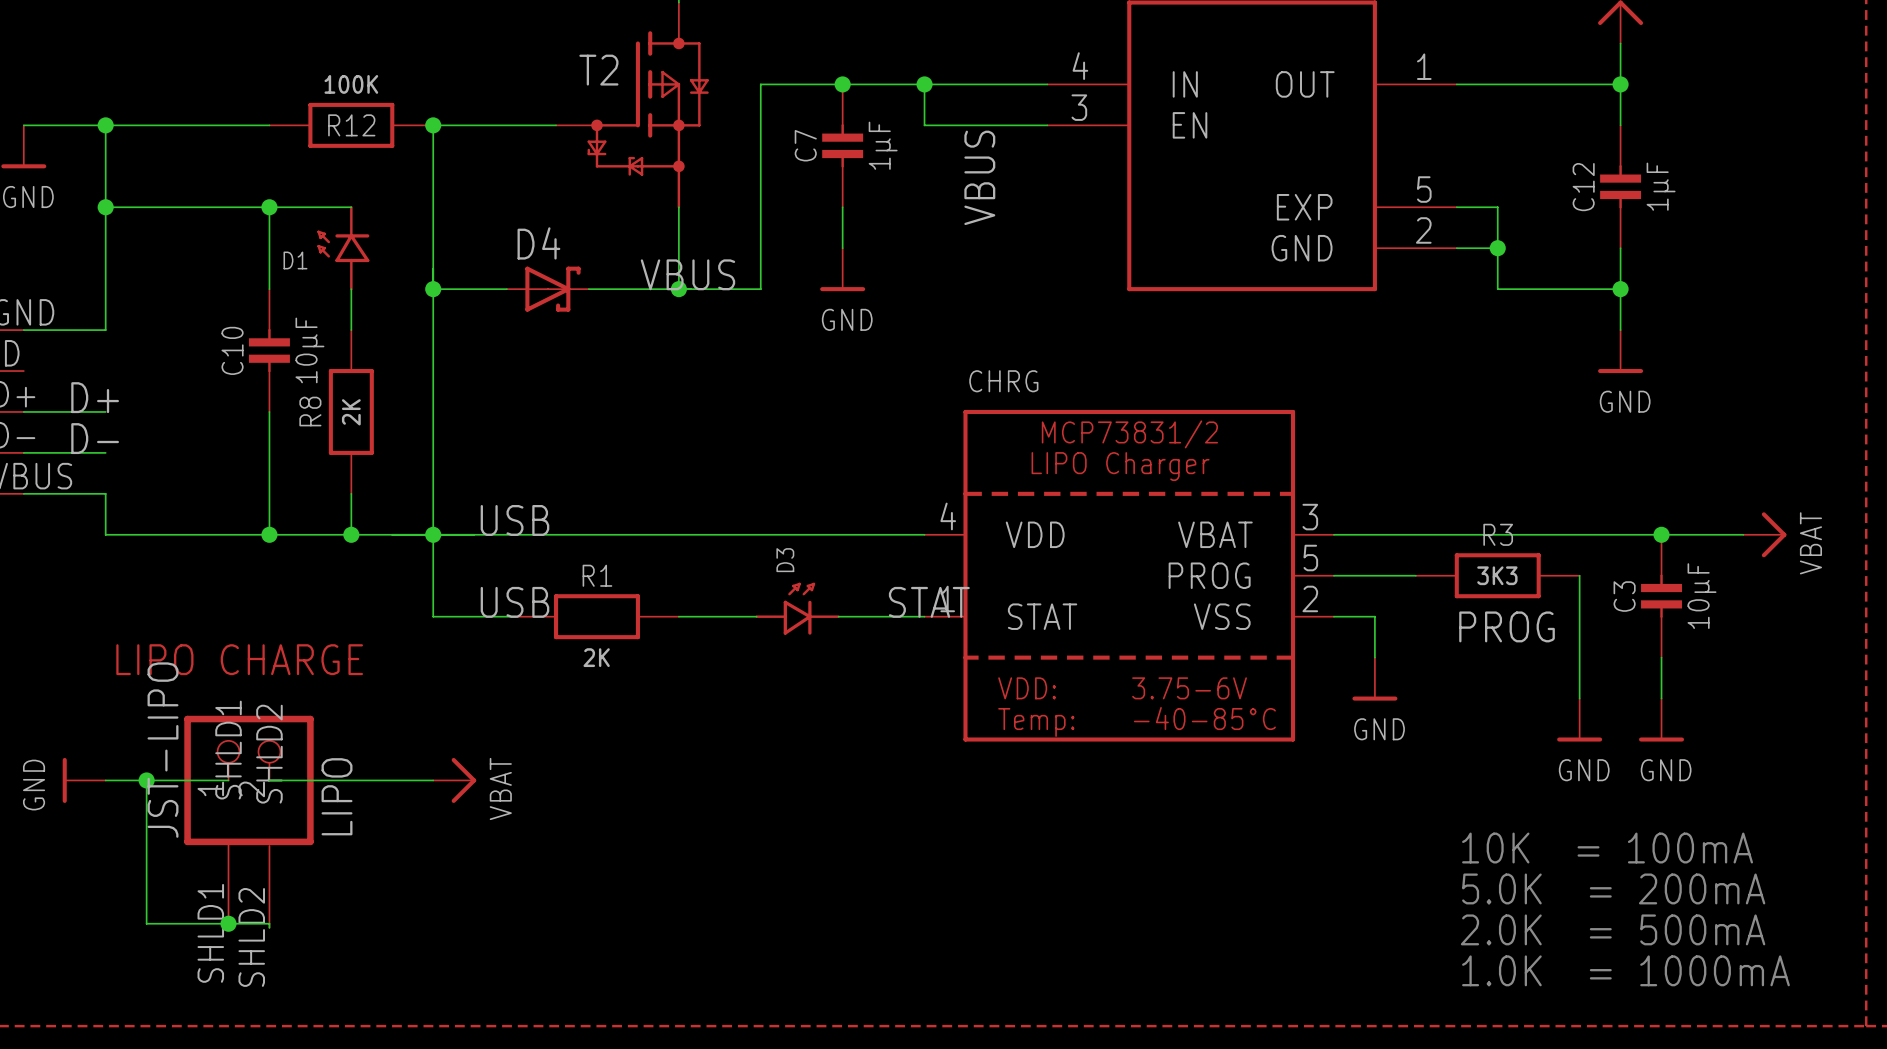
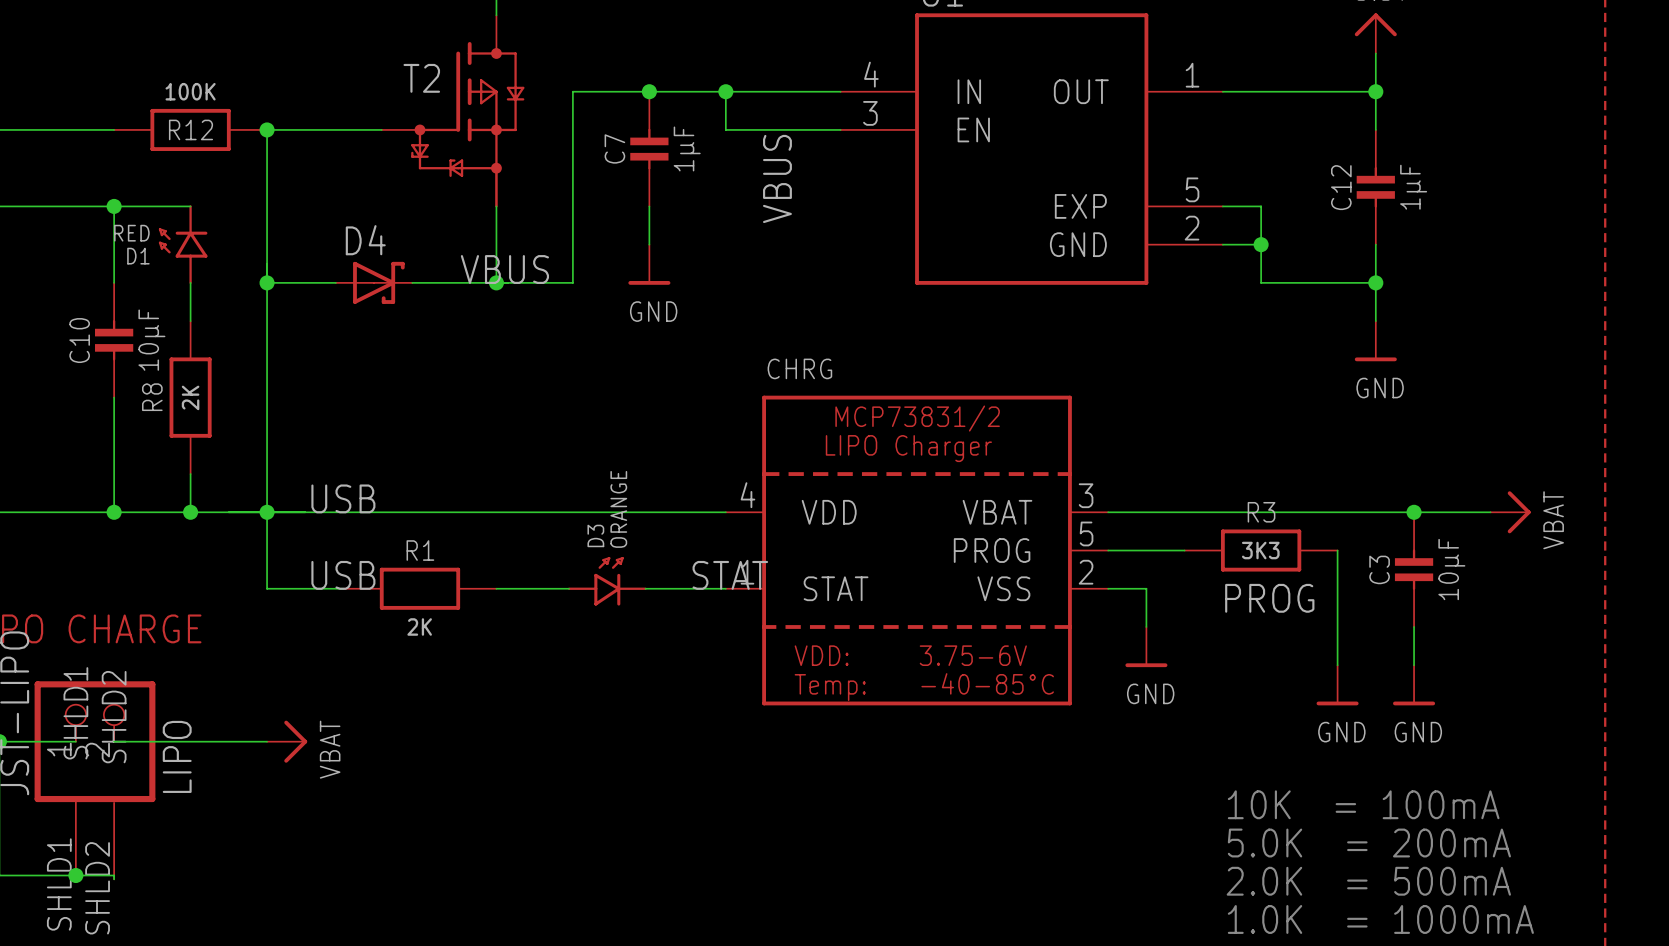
D1 value: none -> RED (131, 233)
D3 value: none -> ORANGE (618, 509)

